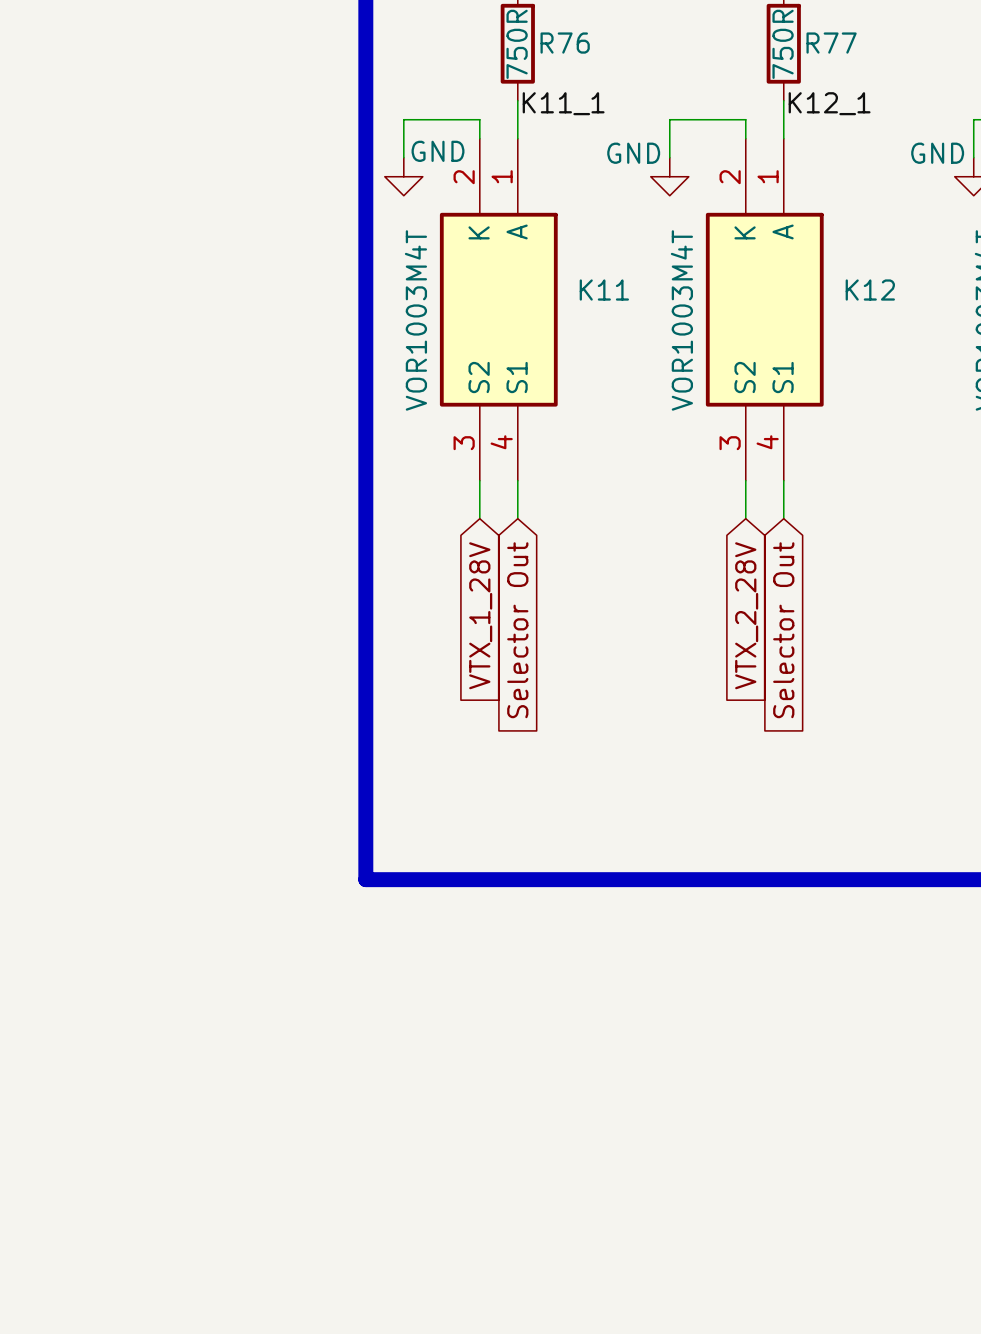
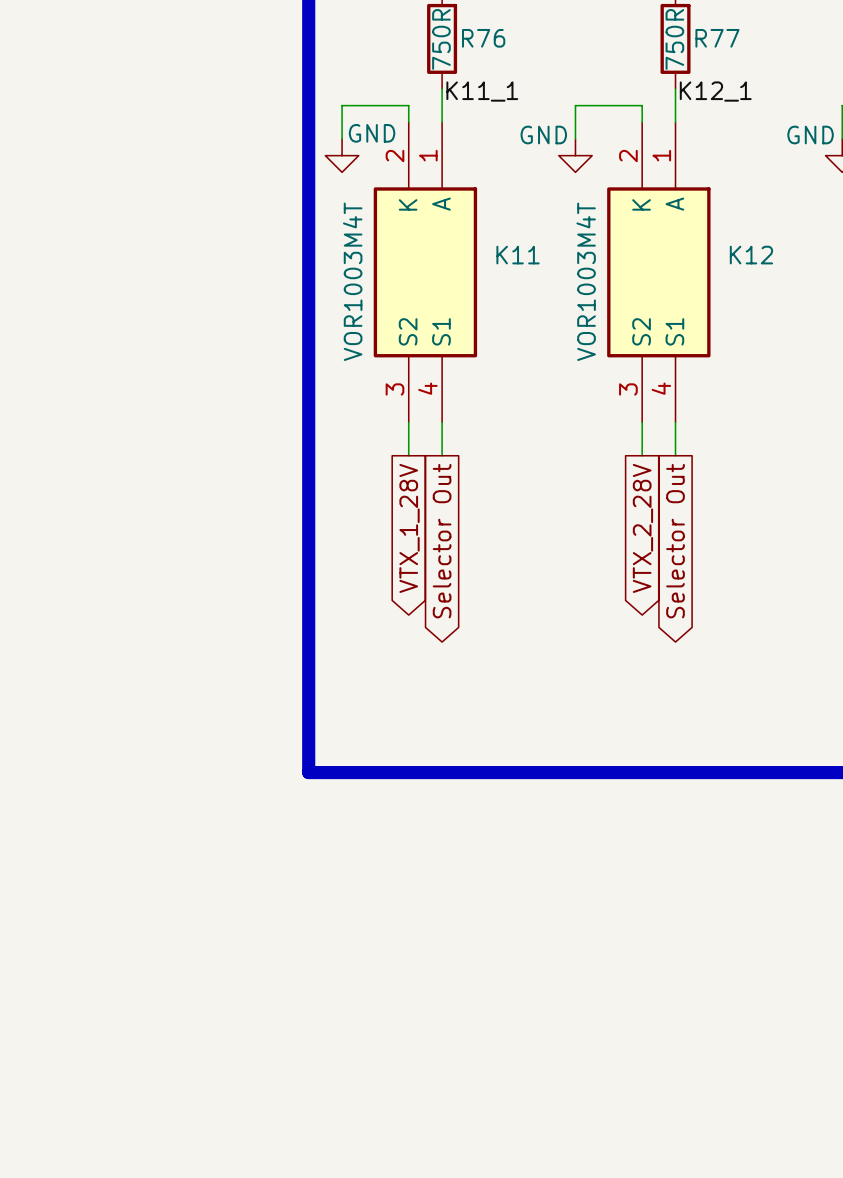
global label shape: input (480, 615) -> output (409, 528)
global label shape: input (746, 615) -> output (642, 528)
global label shape: input (517, 630) -> output (442, 541)
global label shape: input (783, 630) -> output (675, 541)

